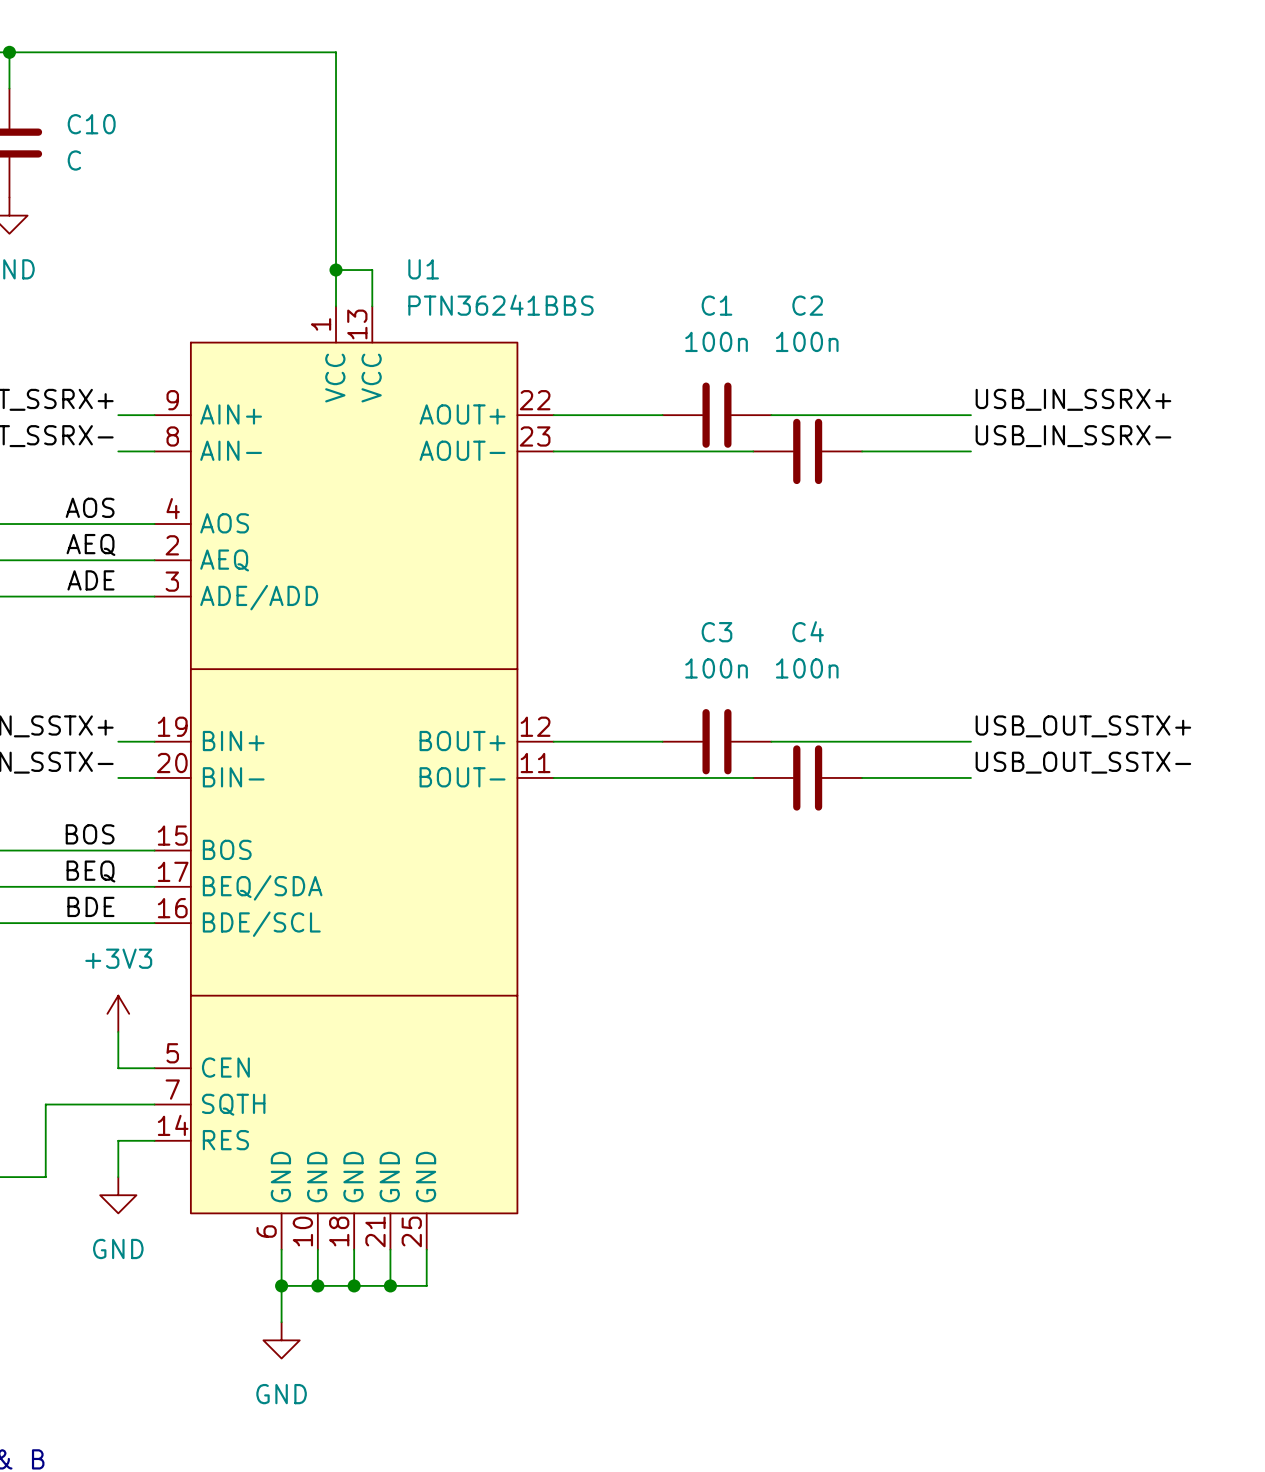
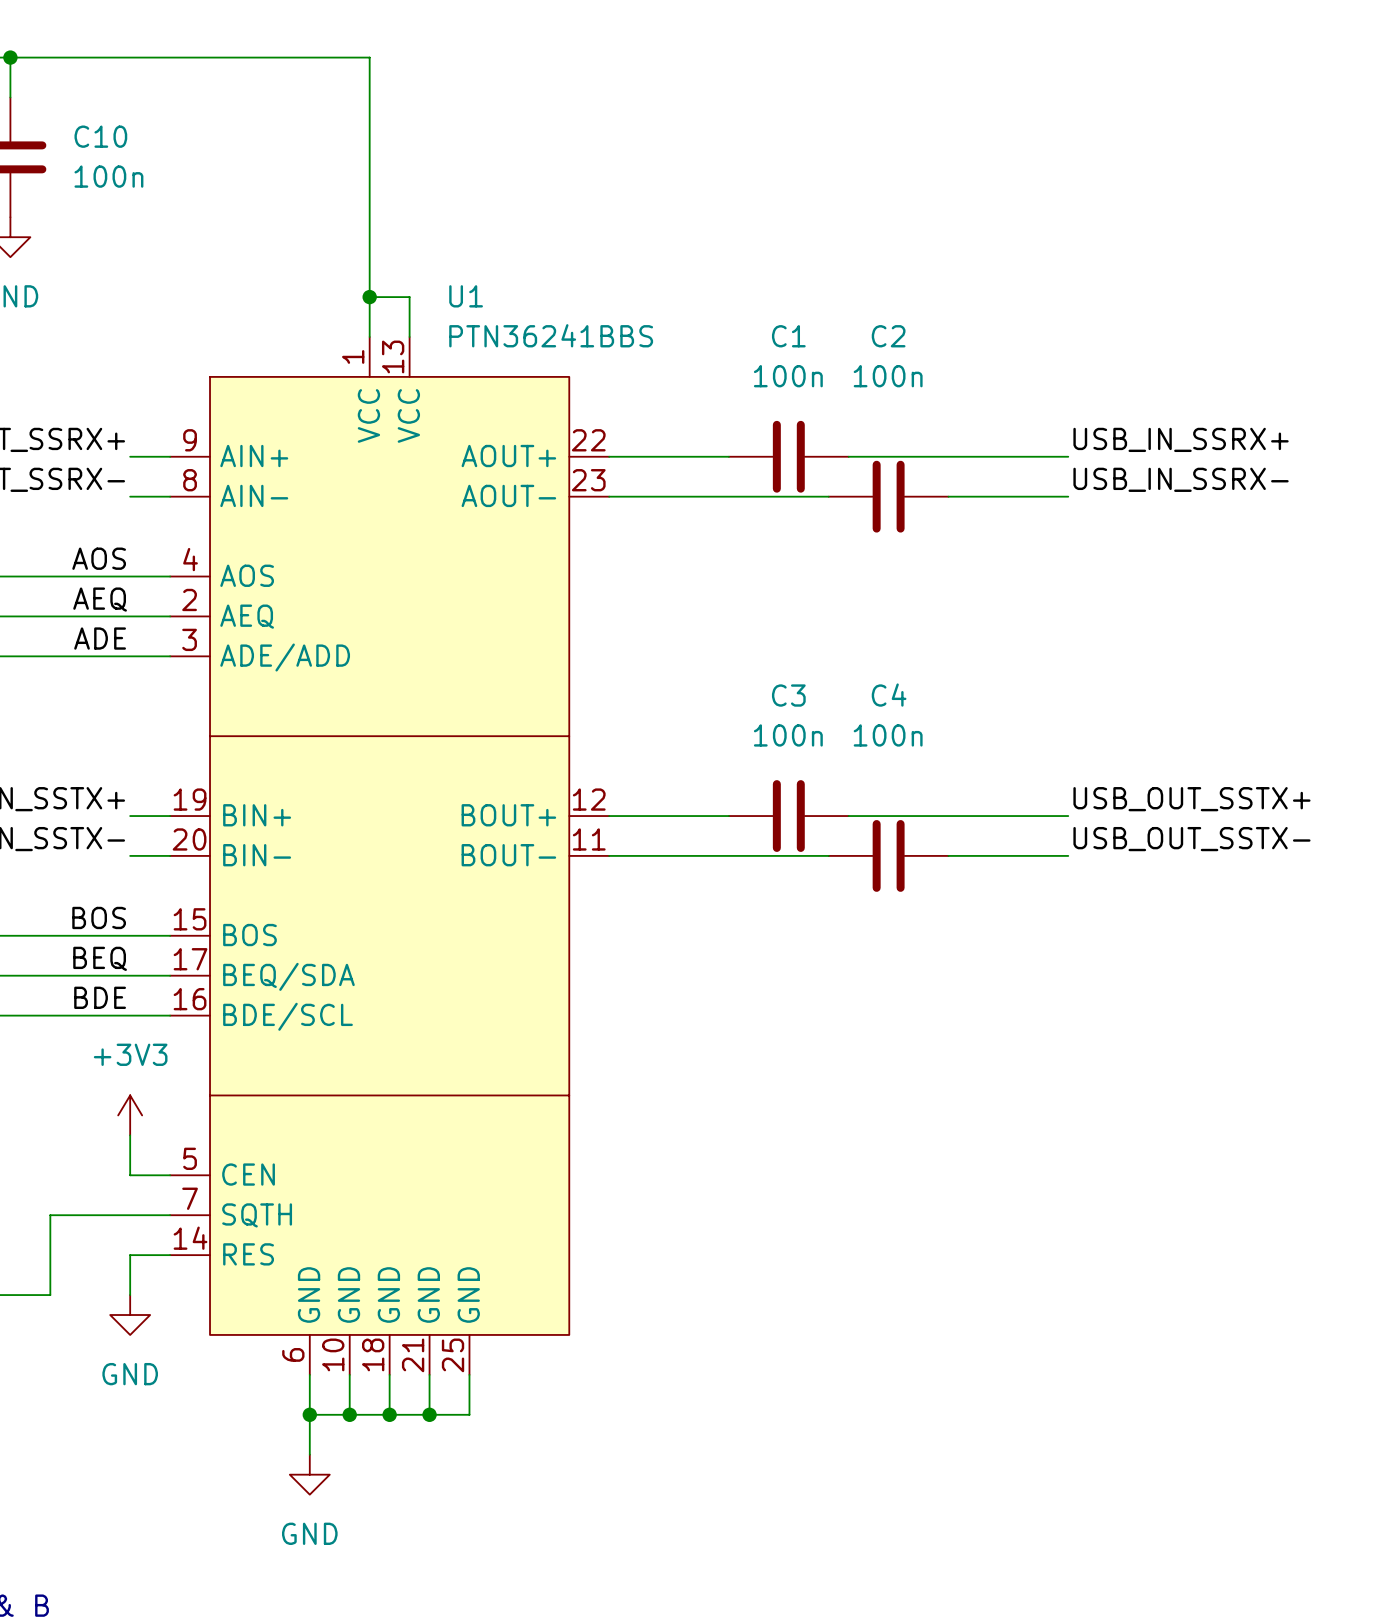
C10 value: C (74, 160) -> 100n (108, 176)

